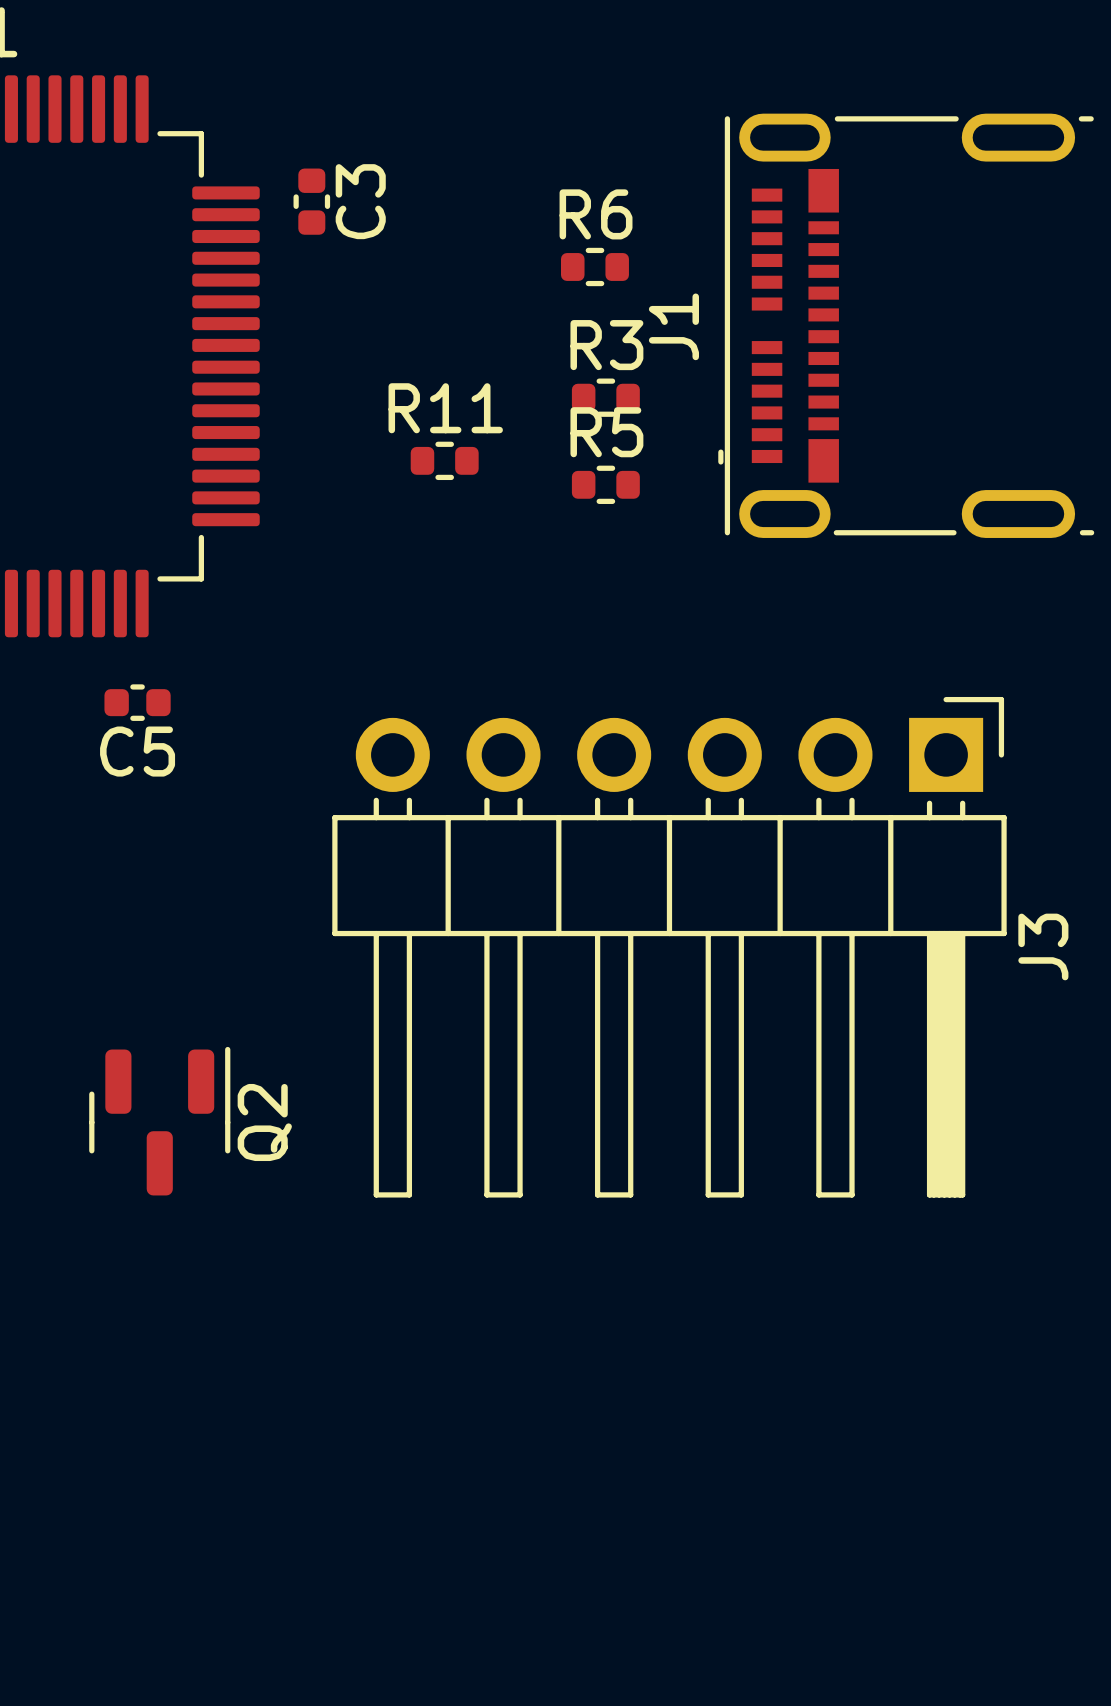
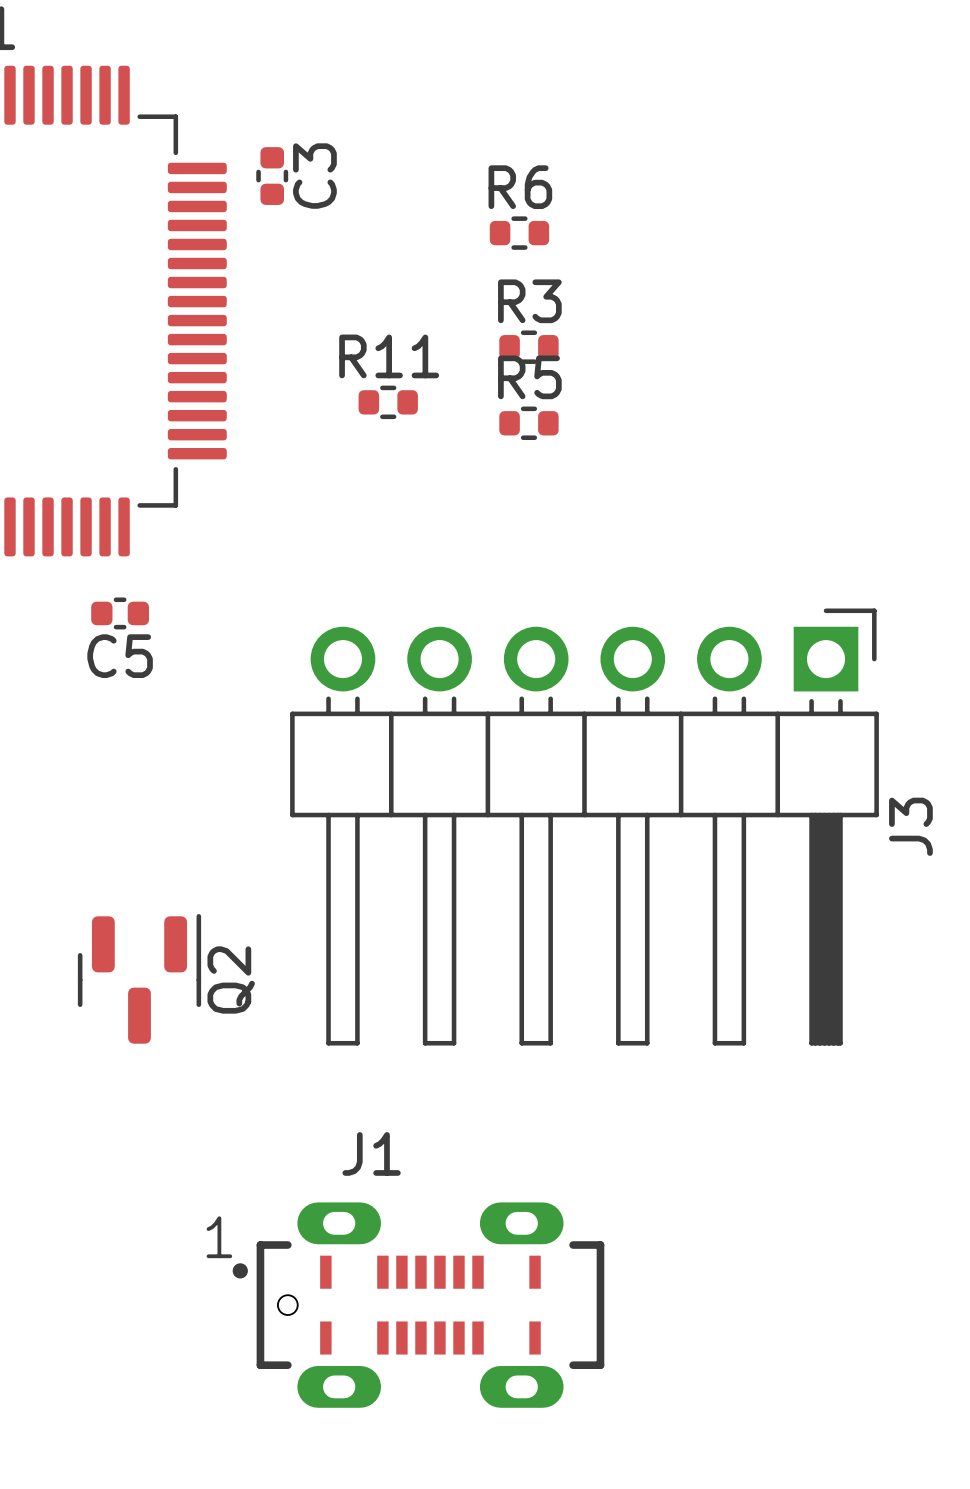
J1 footprint: [718, 113, 1095, 538] -> [232, 1202, 605, 1408]
J1 name position: J1 (673, 326) -> J1 (371, 1153)

